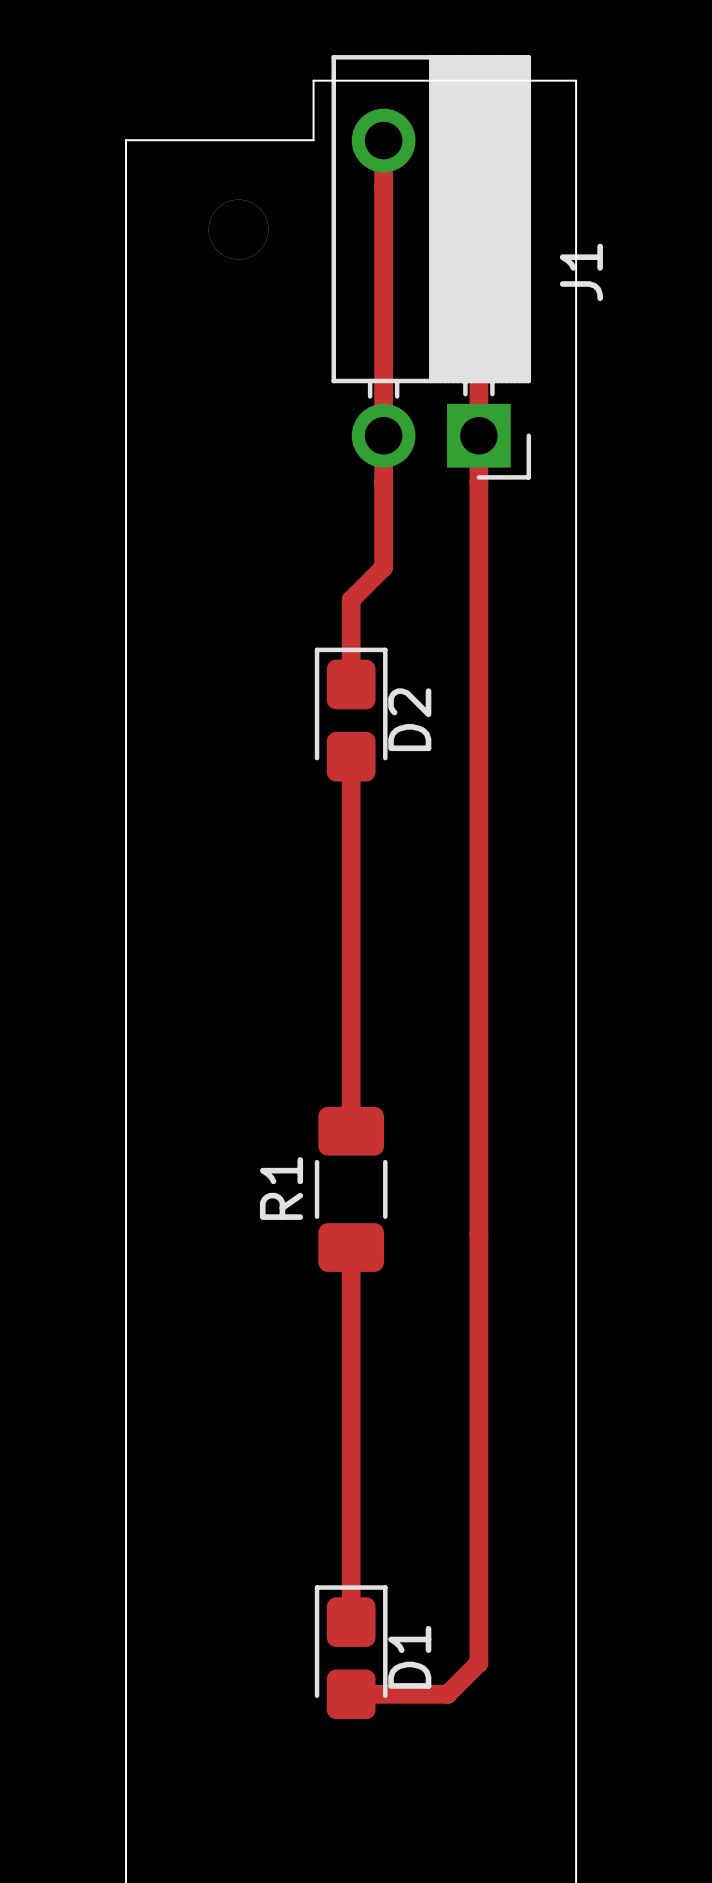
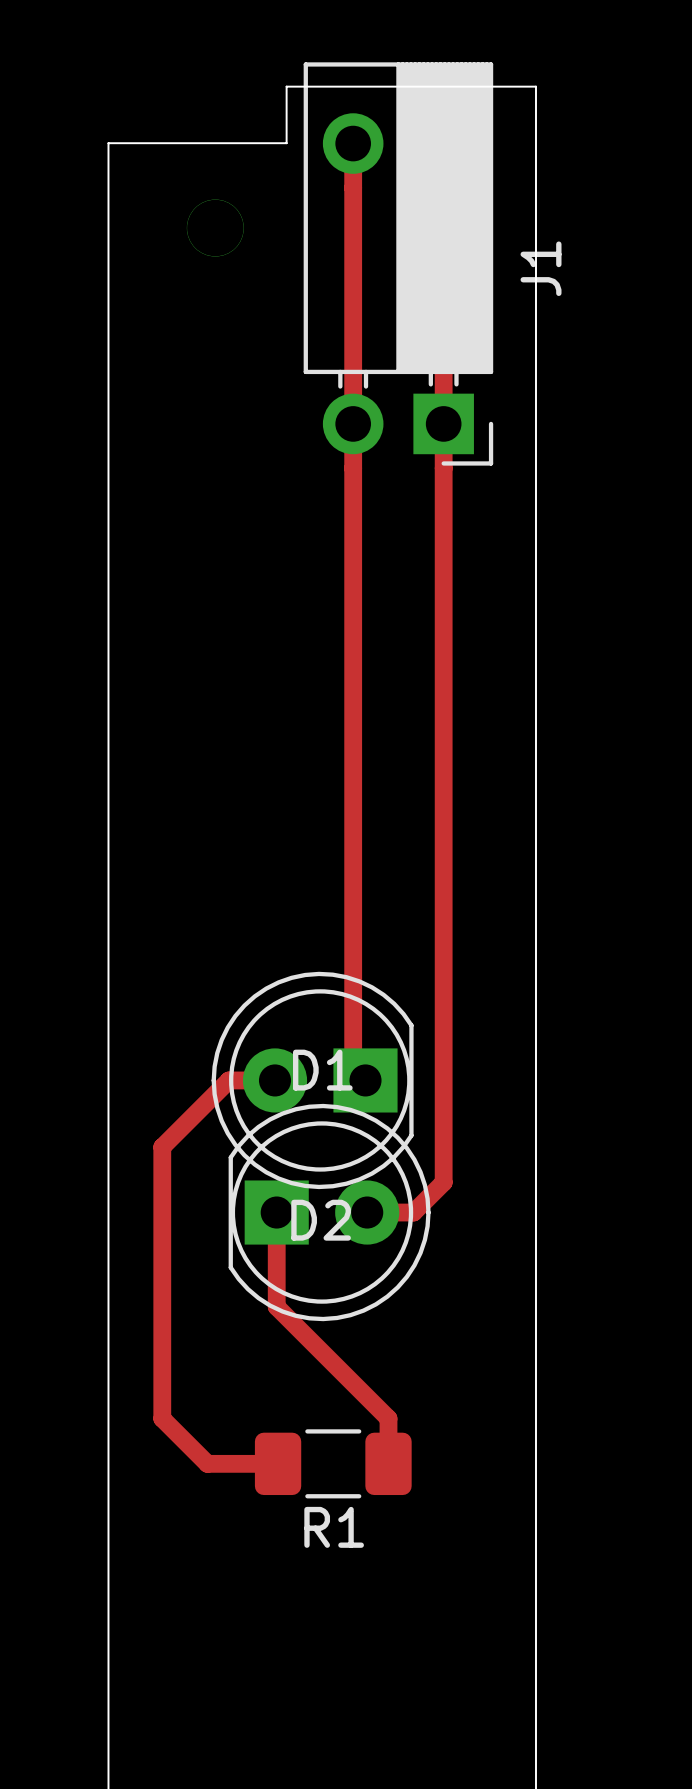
top track: (383, 567) (351, 599) (351, 684) -> (353, 549) (353, 1068) (365, 1080)
D2 footprint: [314, 647, 388, 782] -> [211, 971, 414, 1190]
D2 name position: D2 (409, 719) -> D2 (321, 1220)
top track: (351, 756) (351, 1131) -> none
top track: none -> (275, 1080) (228, 1080) (162, 1147) (162, 1418) (207, 1463) (278, 1463)
R1 name position: R1 (281, 1188) -> R1 (334, 1527)
R1 rotation: 0° (351, 1189) -> 90° clockwise (333, 1463)
R1 position: (351, 1189) -> (333, 1463)
top track: (478, 1234) (478, 1663) (447, 1694) (351, 1694) -> (443, 1182) (413, 1212) (367, 1212)
top track: (351, 1247) (351, 1622) -> none
top track: none -> (276, 1212) (276, 1306) (388, 1418) (388, 1463)
D1 footprint: [314, 1585, 388, 1720] -> [228, 1103, 431, 1322]
D1 name position: D1 (409, 1657) -> D1 (322, 1070)

